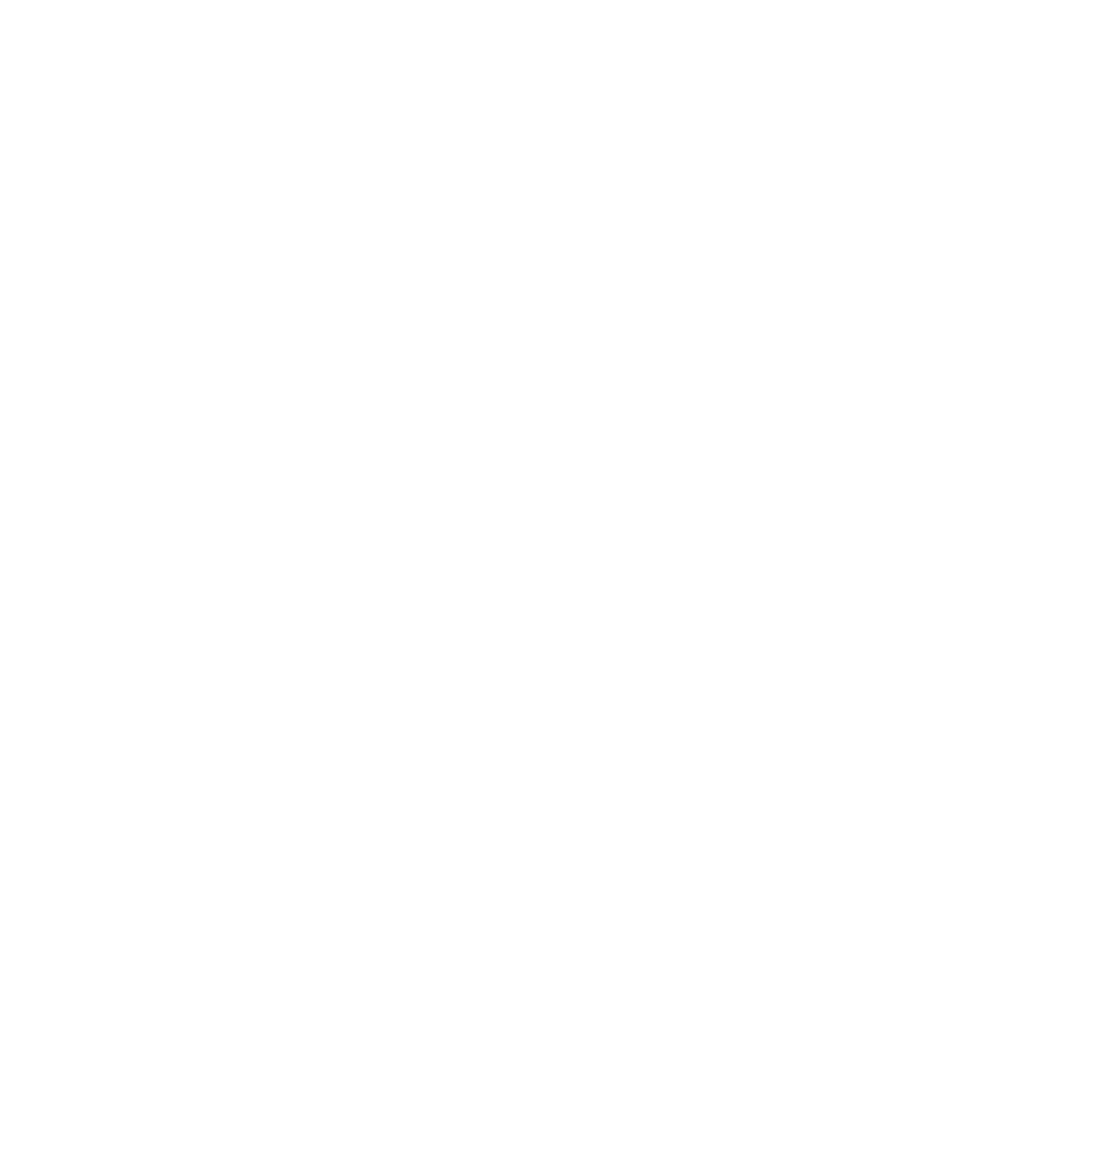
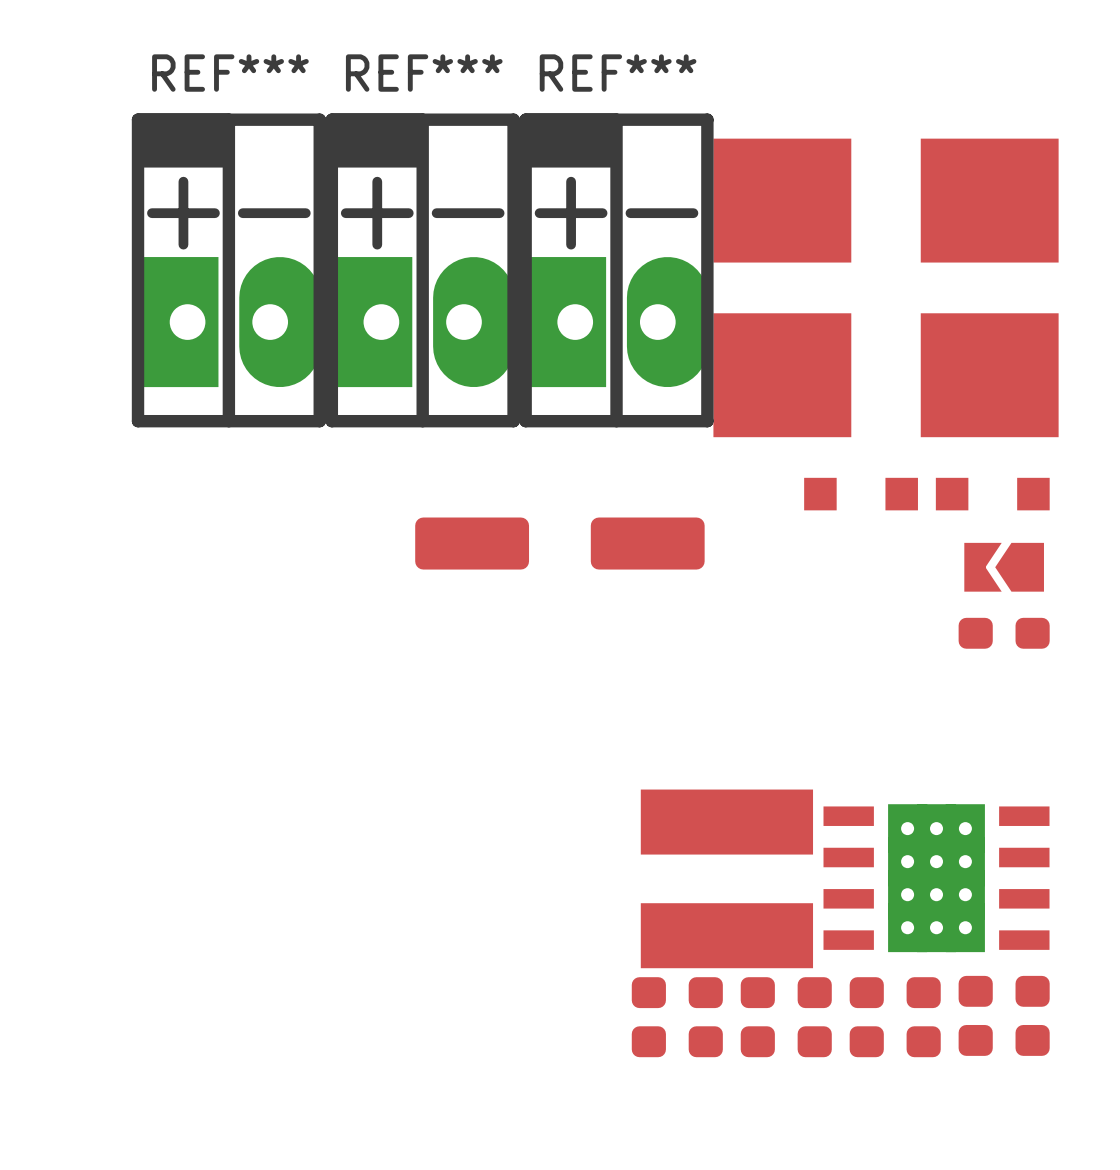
part: none -> (886, 200)
part: none -> (228, 270)
part: none -> (422, 270)
part: none -> (616, 270)
part: none -> (886, 375)
part: none -> (861, 494)
part: none -> (992, 494)
part: none -> (559, 543)
part: none -> (1004, 567)
part: none -> (1004, 633)
part: none -> (726, 878)
part: none -> (936, 878)
part: none -> (1004, 991)
part: none -> (677, 992)
part: none -> (786, 992)
part: none -> (895, 992)
part: none -> (1004, 1040)
part: none -> (677, 1041)
part: none -> (786, 1041)
part: none -> (895, 1041)

